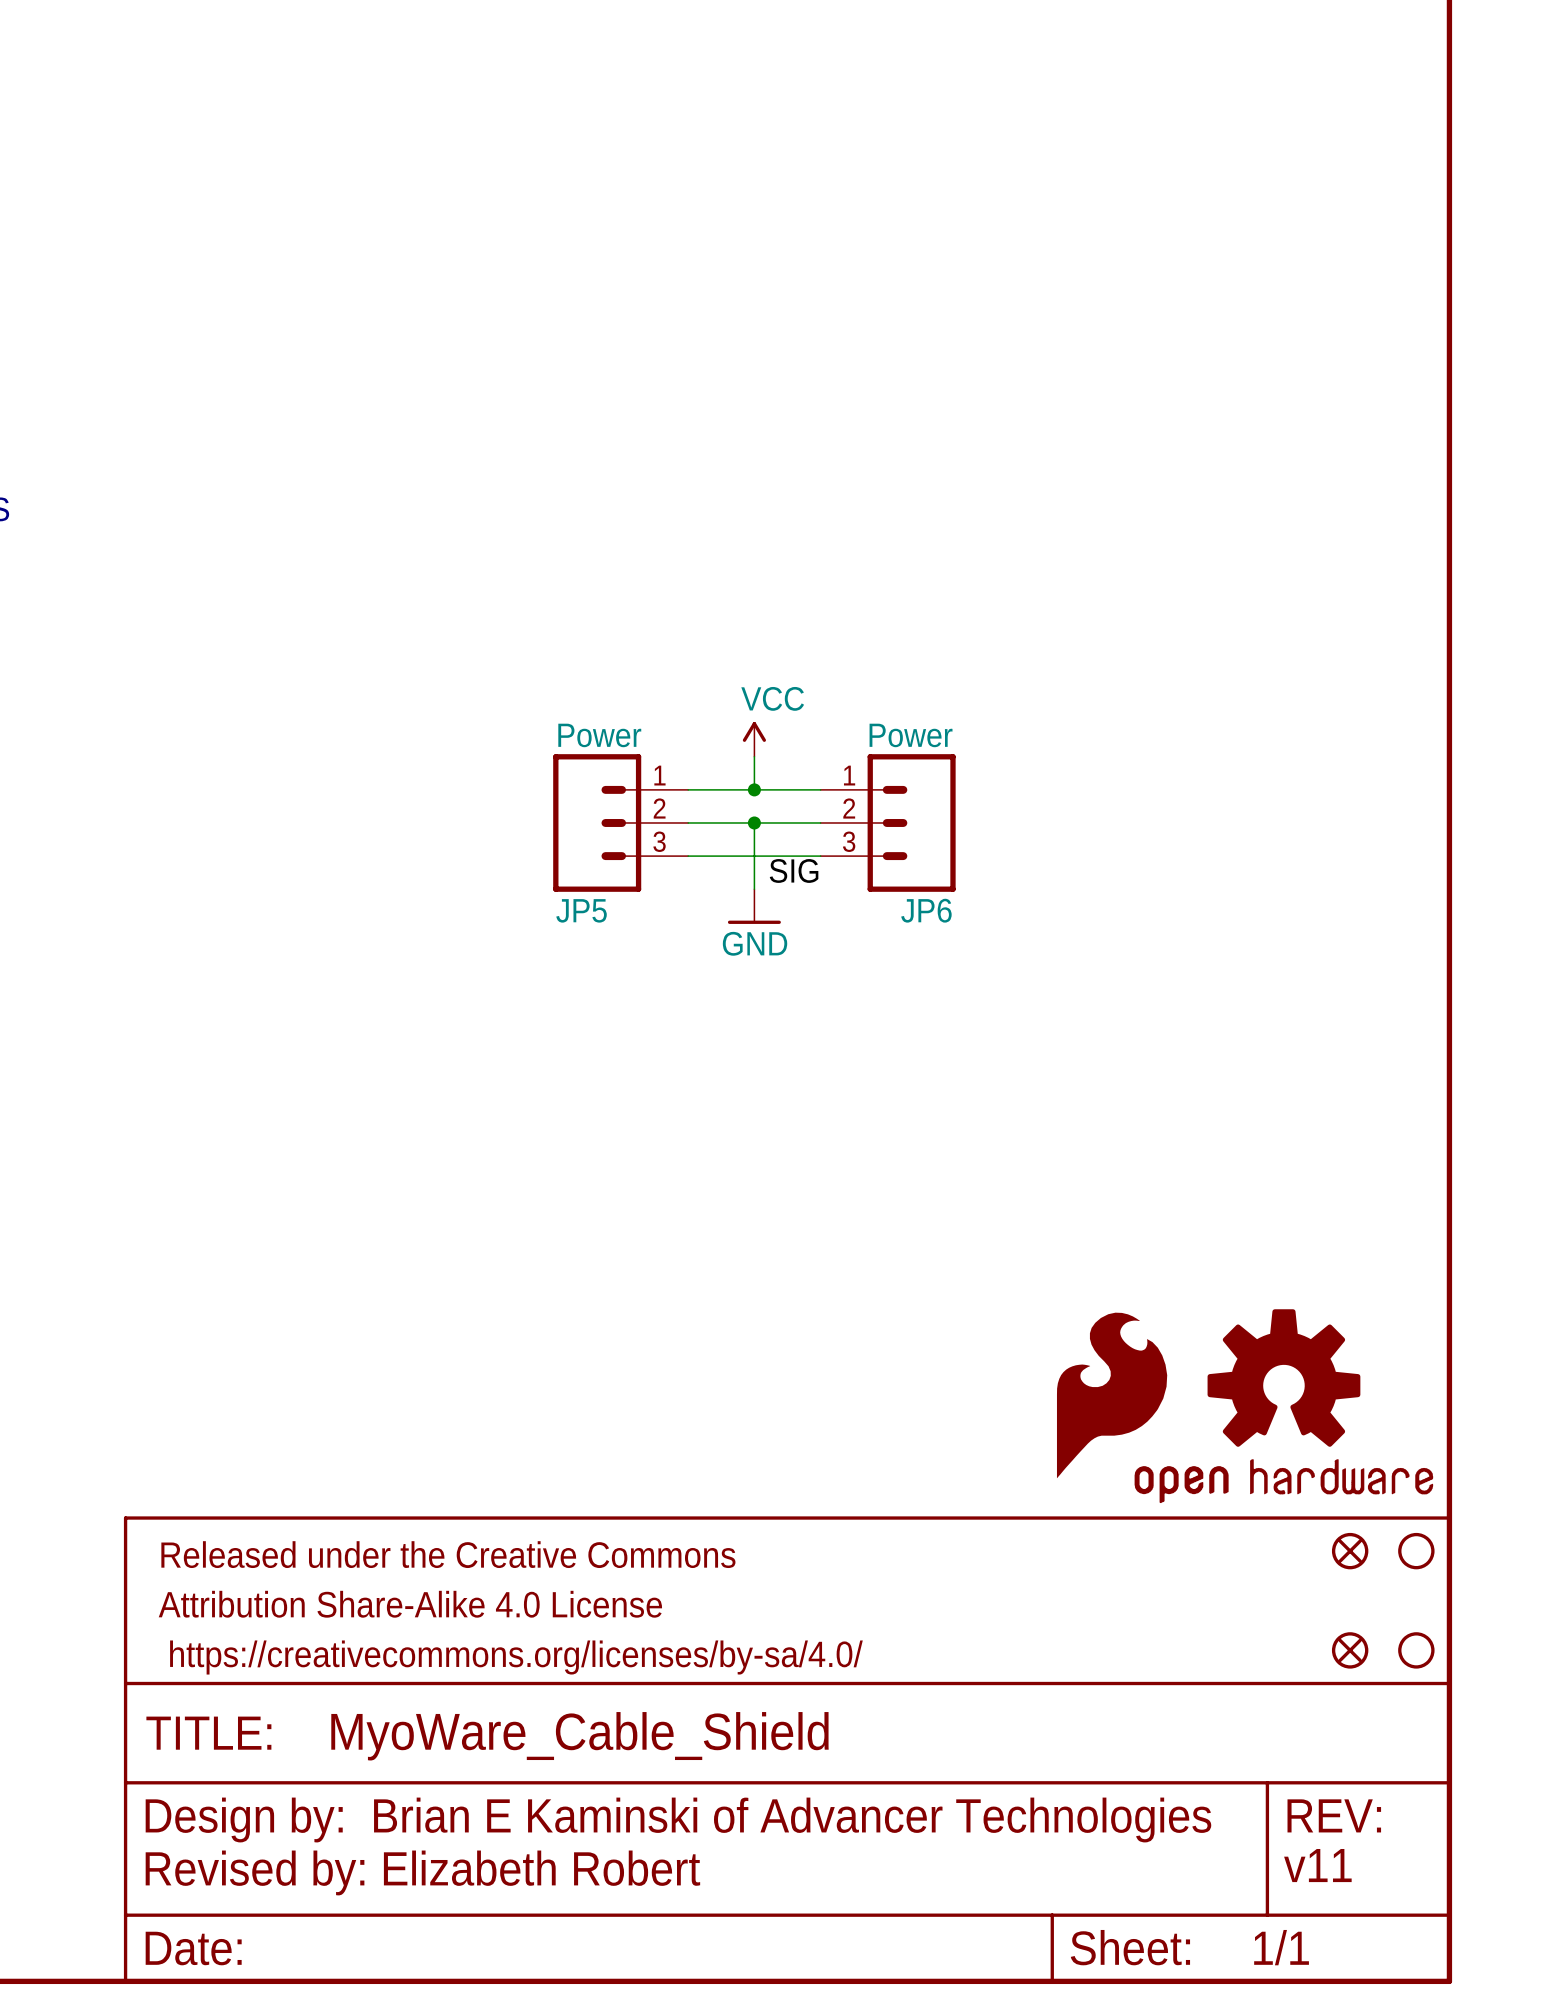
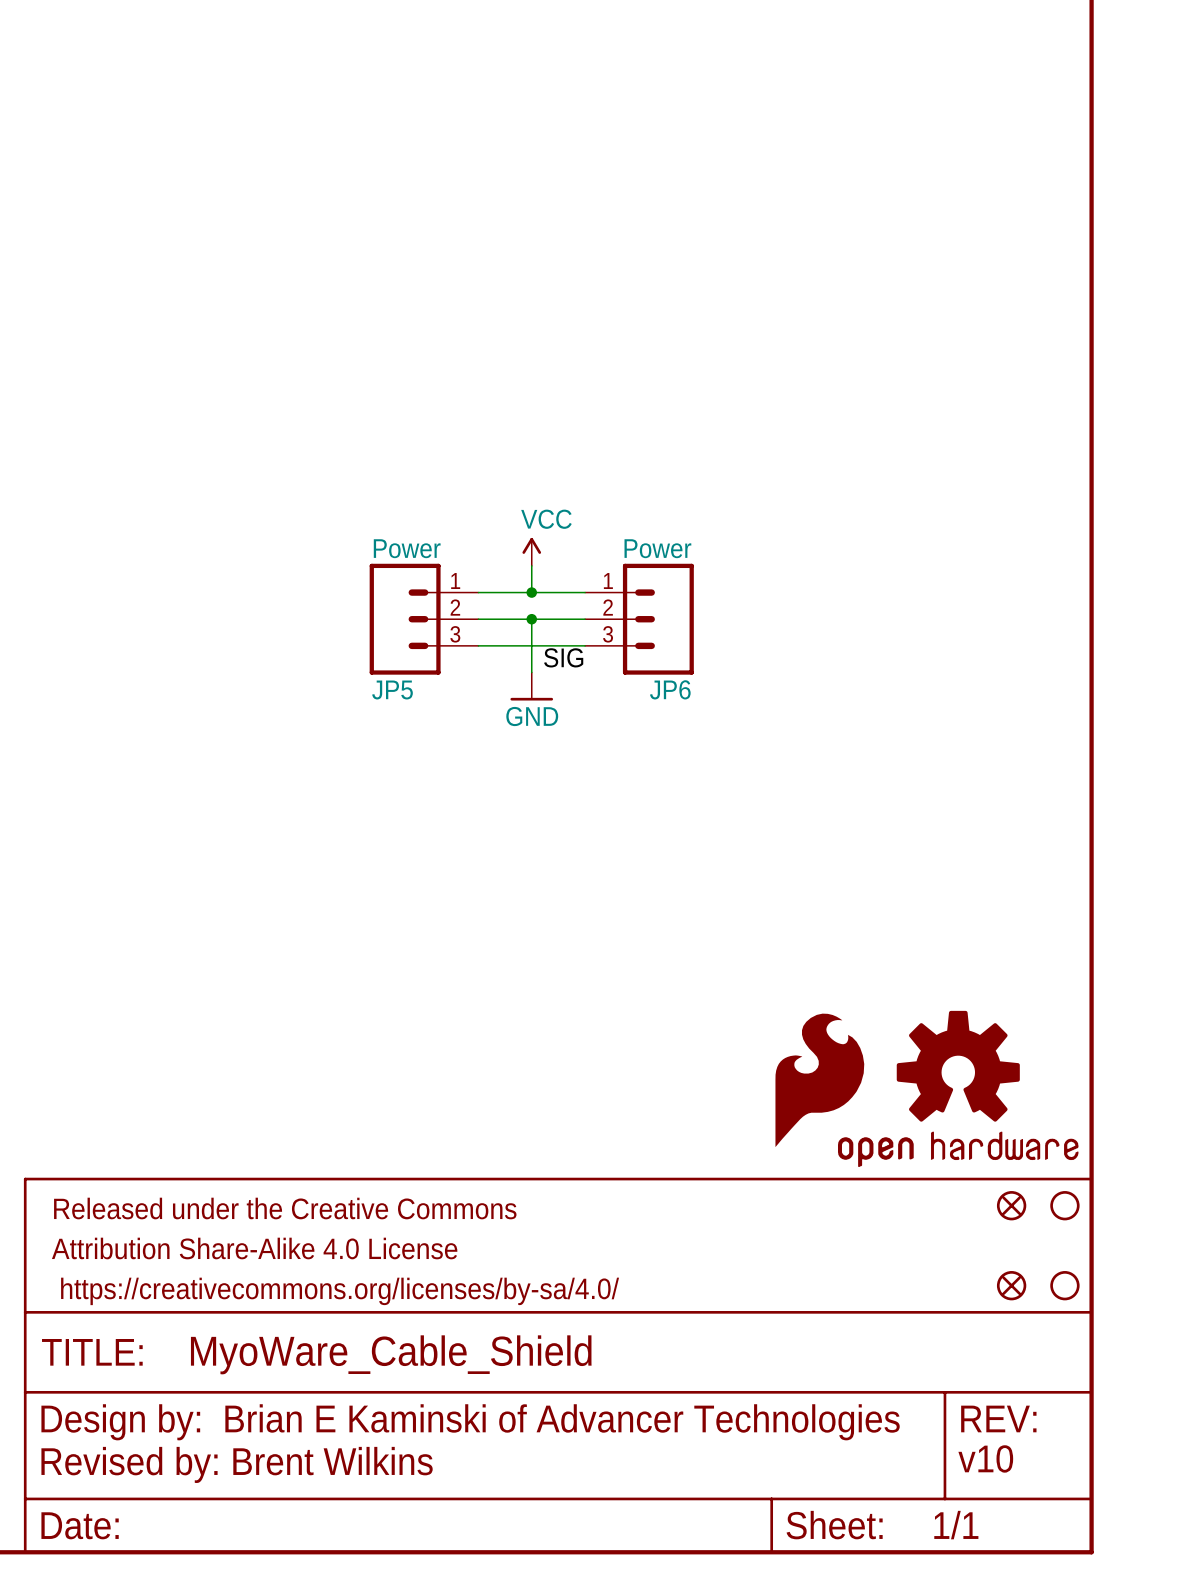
text: v11 (1317, 1865) -> v10 (985, 1458)
text: Revised by: Elizabeth Robert (422, 1872) -> Revised by: Brent Wilkins (237, 1464)

